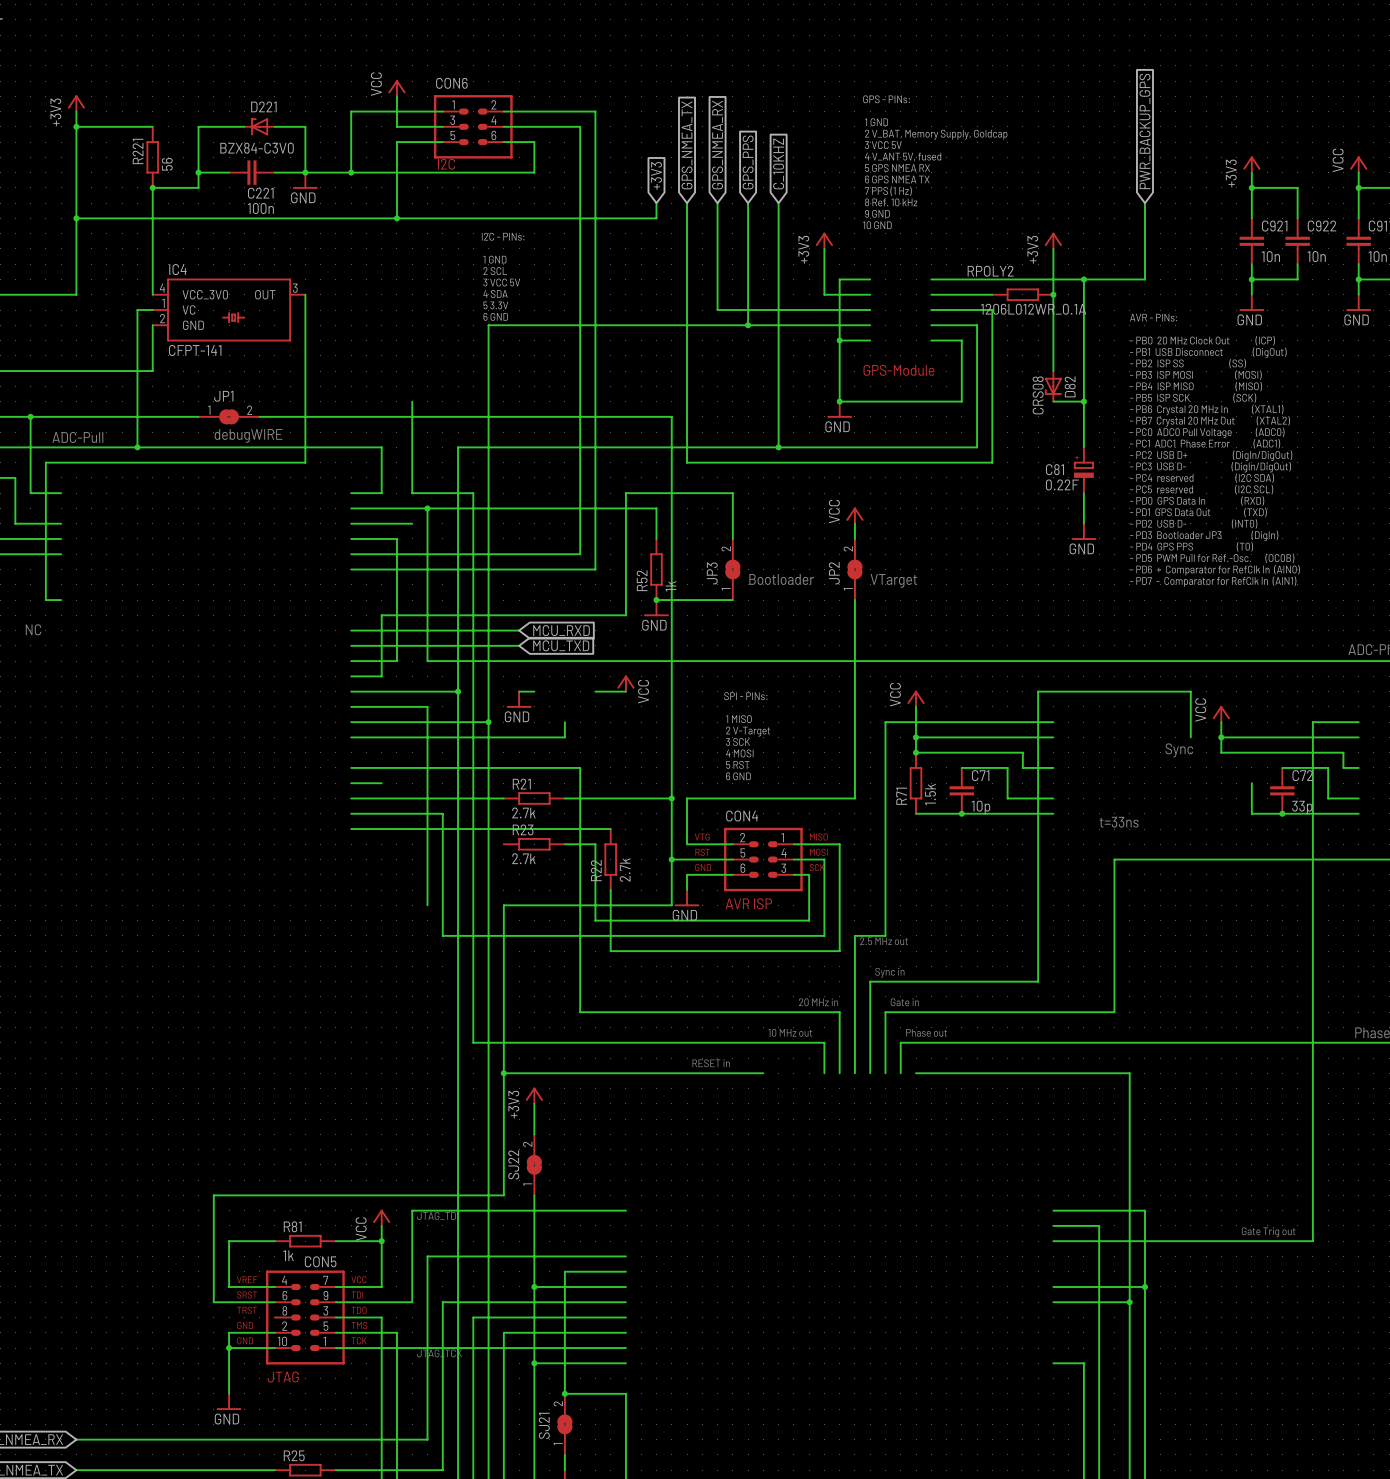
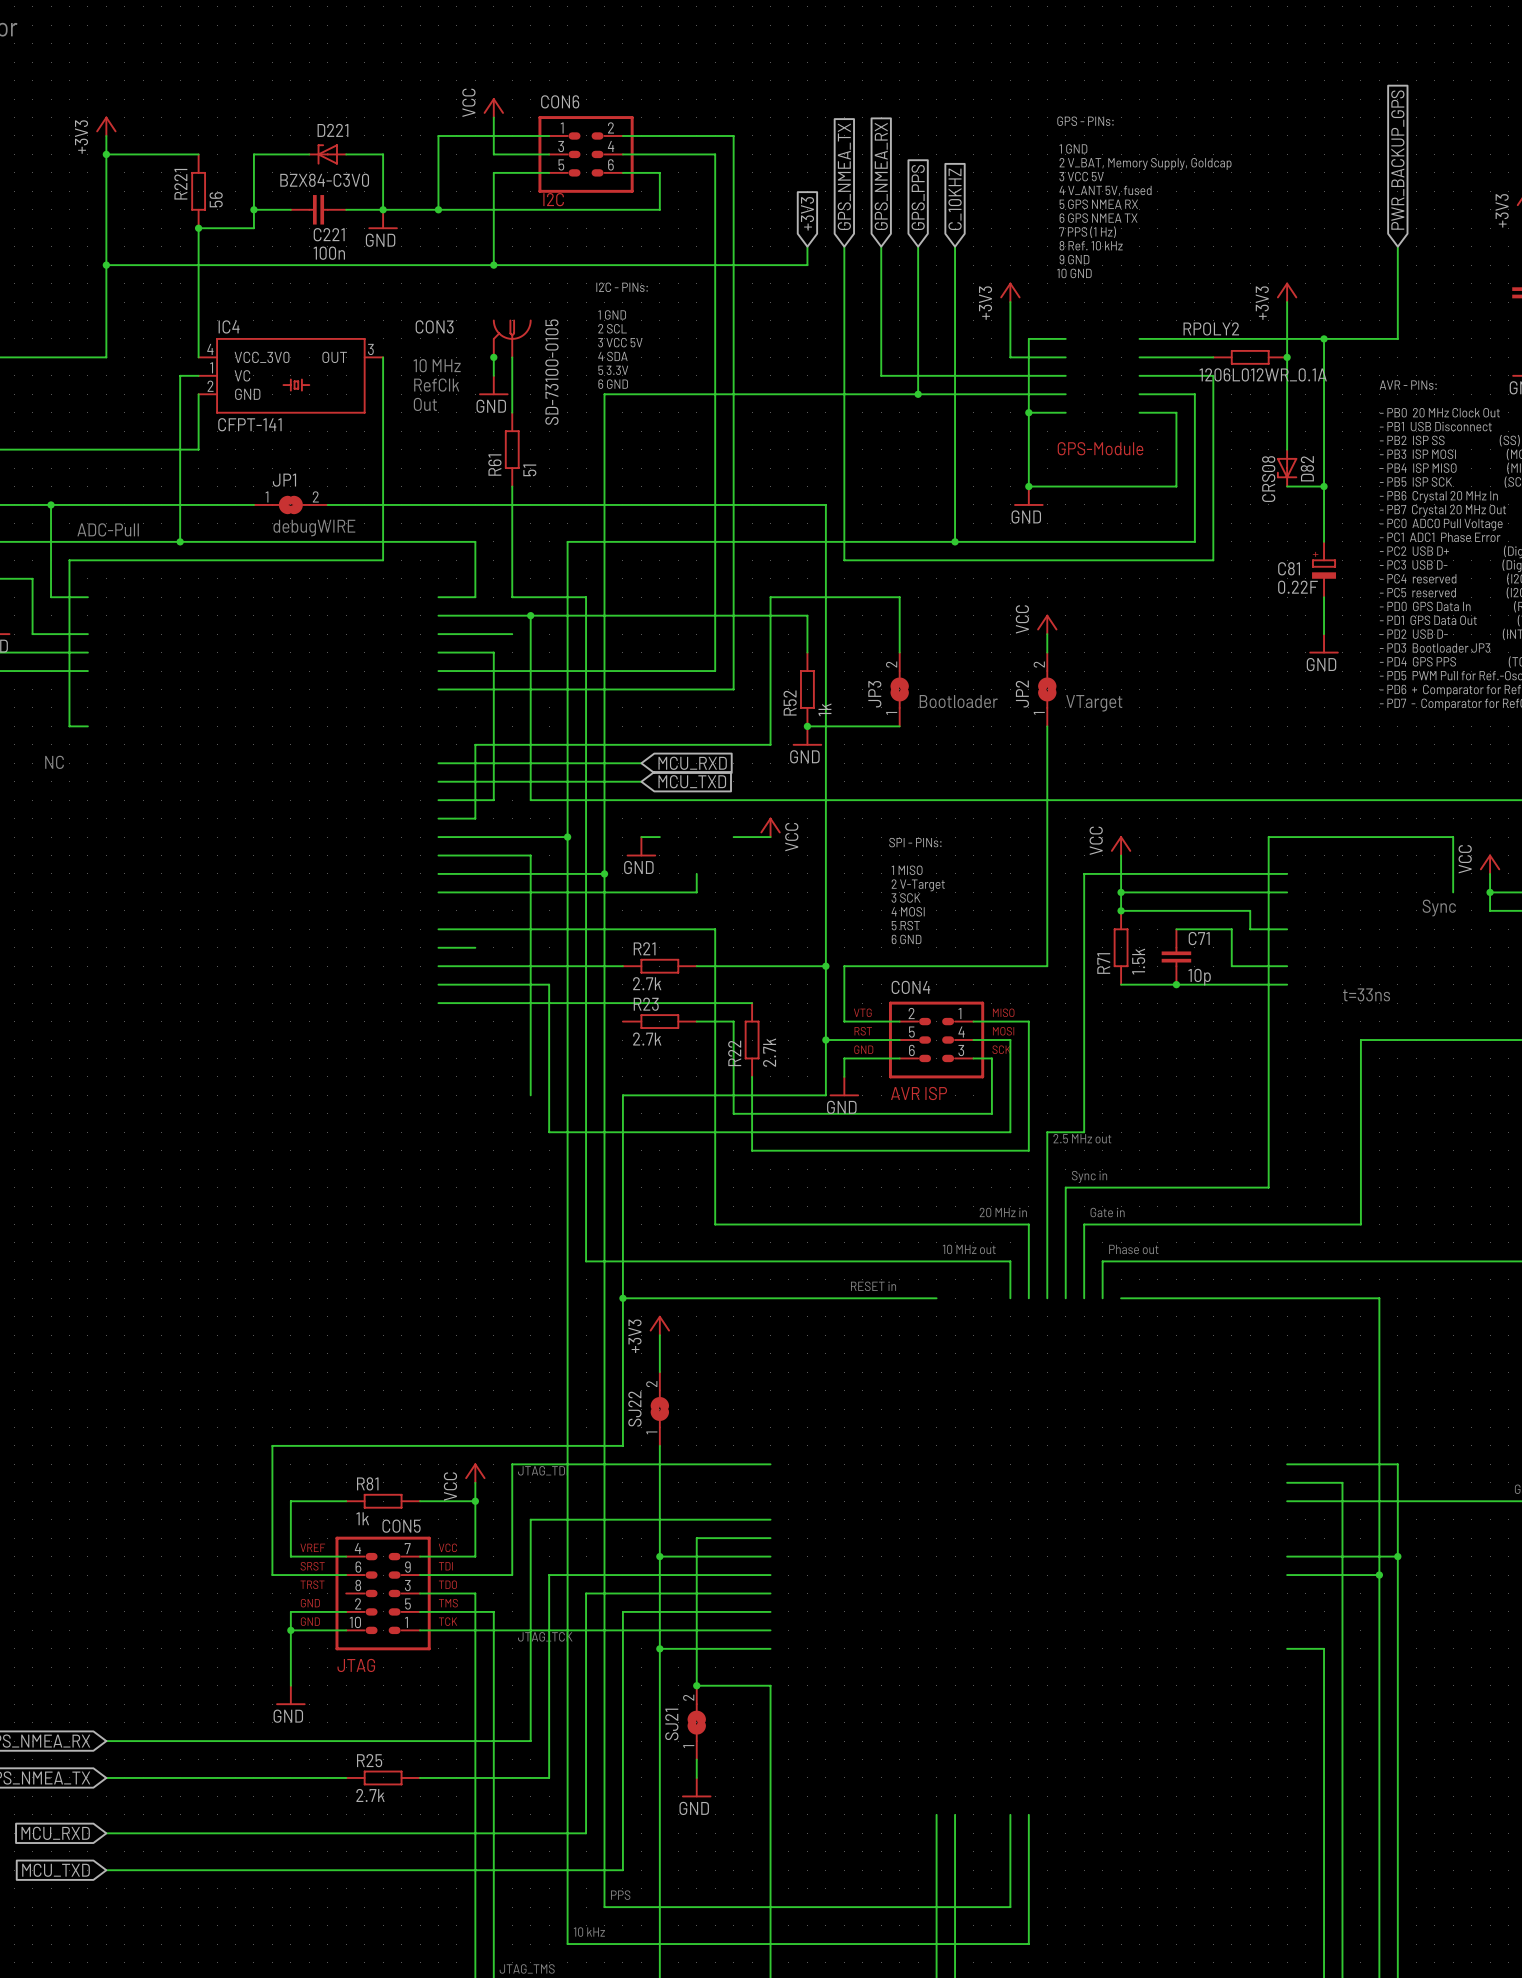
CON3: none -> SD-73100-0105 (512, 338)
wire: none -> (493, 357) (493, 375)
junction: none -> (493, 357)
wire: none -> (512, 357) (512, 412)
text: none -> 10 MHz (437, 365)
text: none -> RefClk (436, 385)
power symbol: none -> GND (493, 385)
text: none -> Out (425, 404)
R61: none -> 51 (512, 449)

